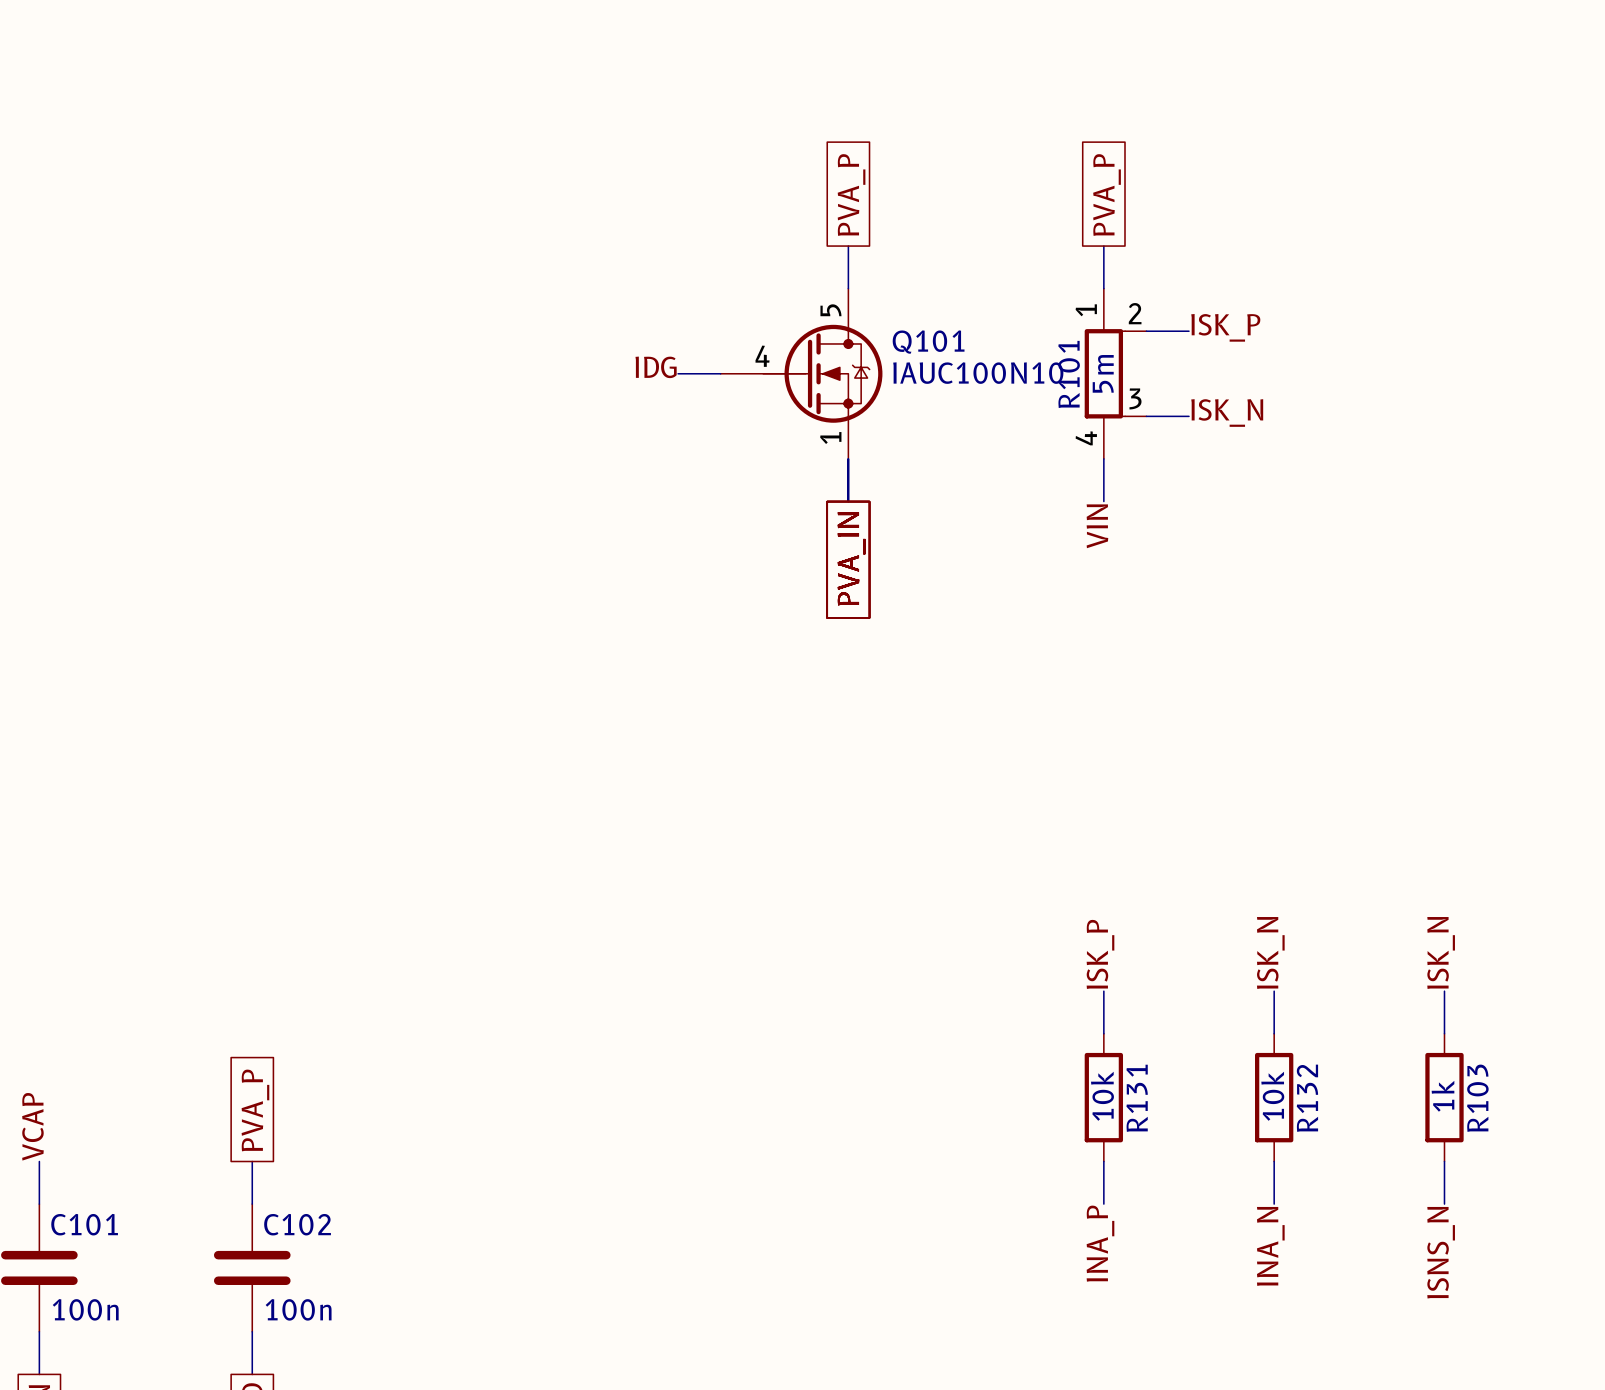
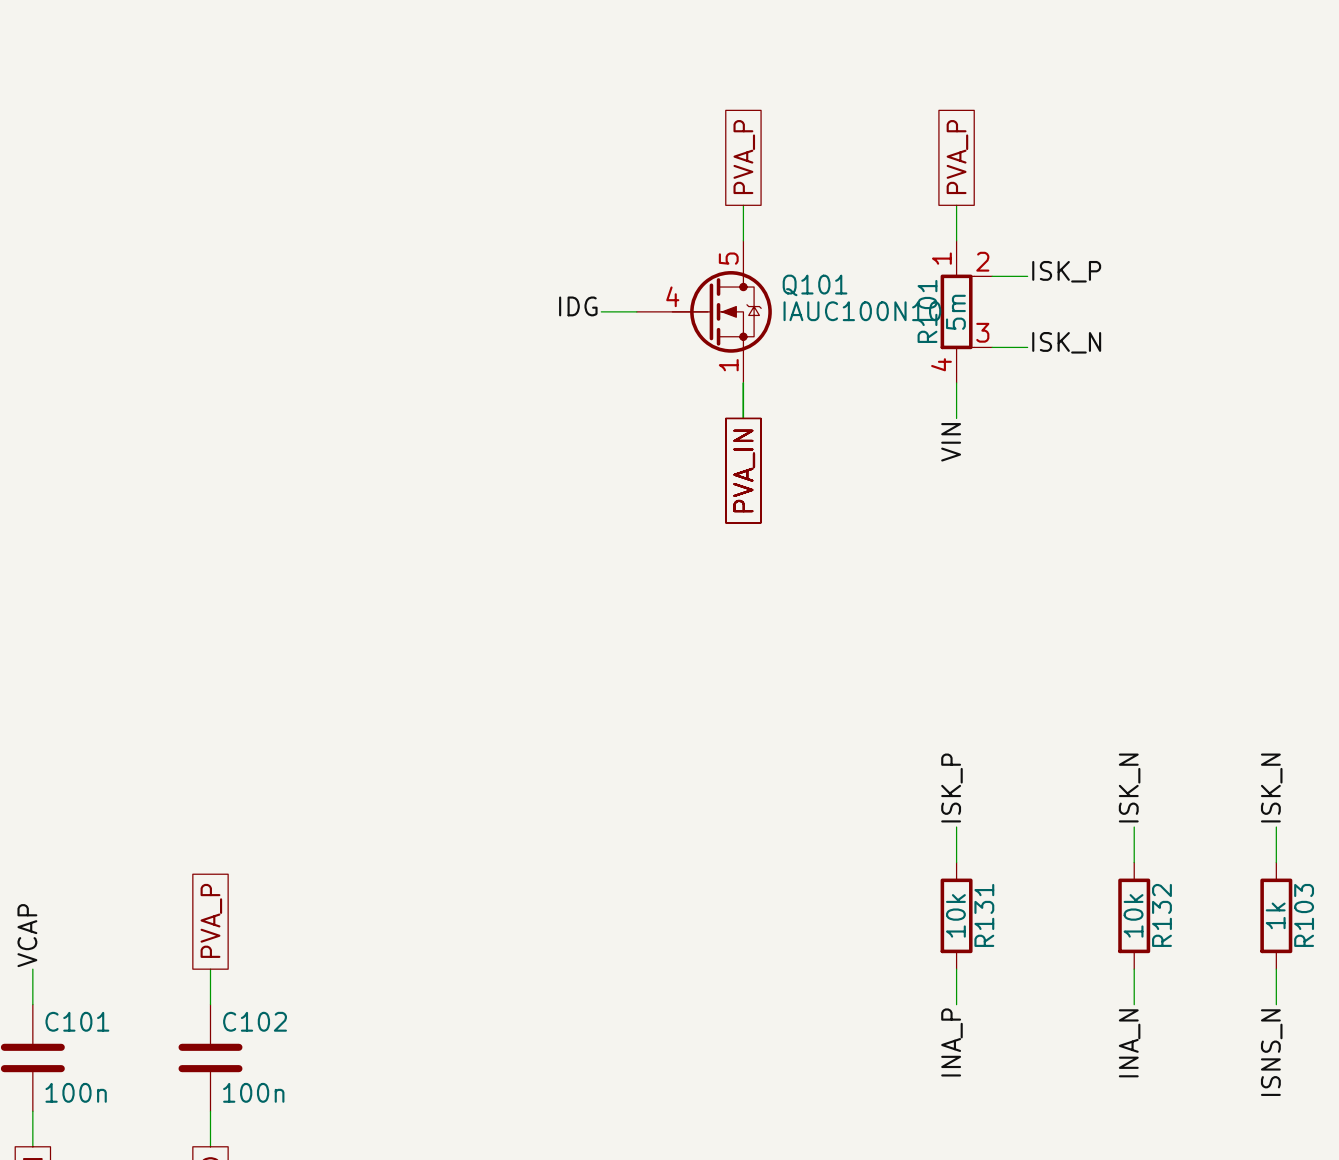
global label position: PVA_P (851, 195) -> PVA_P (744, 157)
global label position: PVA_P (1107, 195) -> PVA_P (957, 157)
wire: (848, 246) (848, 288) -> (743, 205) (743, 240)
wire: (1103, 246) (1103, 288) -> (956, 205) (956, 240)
label position: ISK_P (1225, 327) -> ISK_P (1066, 271)
label position: IDG (656, 367) -> IDG (578, 306)
Q101 position: (801, 373) -> (704, 311)
R101 position: (1115, 373) -> (966, 311)
label position: ISK_N (1227, 413) -> ISK_N (1066, 342)
wire: (848, 458) (848, 501) -> (743, 382) (743, 418)
wire: (1103, 458) (1103, 501) -> (956, 382) (956, 418)
label position: VIN (1097, 526) -> VIN (951, 442)
global label position: PVA_IN (851, 558) -> PVA_IN (744, 470)
label: ISK_N (1270, 952) -> none
label: none -> ISK_N (1129, 788)
label: ISK_N (1441, 952) -> none
label: none -> ISK_N (1271, 788)
label position: ISK_P (1100, 954) -> ISK_P (951, 788)
wire: (1103, 991) (1103, 1033) -> (956, 827) (956, 862)
wire: (1274, 991) (1274, 1033) -> (1134, 827) (1134, 862)
wire: (1444, 991) (1444, 1033) -> (1276, 827) (1276, 862)
R131 position: (1103, 1097) -> (956, 915)
R132 position: (1274, 1097) -> (1134, 915)
R103 position: (1444, 1097) -> (1276, 915)
wire: (1103, 1161) (1103, 1204) -> (956, 969) (956, 1004)
wire: (1274, 1161) (1274, 1204) -> (1134, 969) (1134, 1004)
wire: (1444, 1161) (1444, 1204) -> (1276, 969) (1276, 1004)
label position: INA_P (1100, 1243) -> INA_P (951, 1042)
label position: INA_N (1270, 1246) -> INA_N (1129, 1043)
label position: ISNS_N (1441, 1252) -> ISNS_N (1271, 1052)

